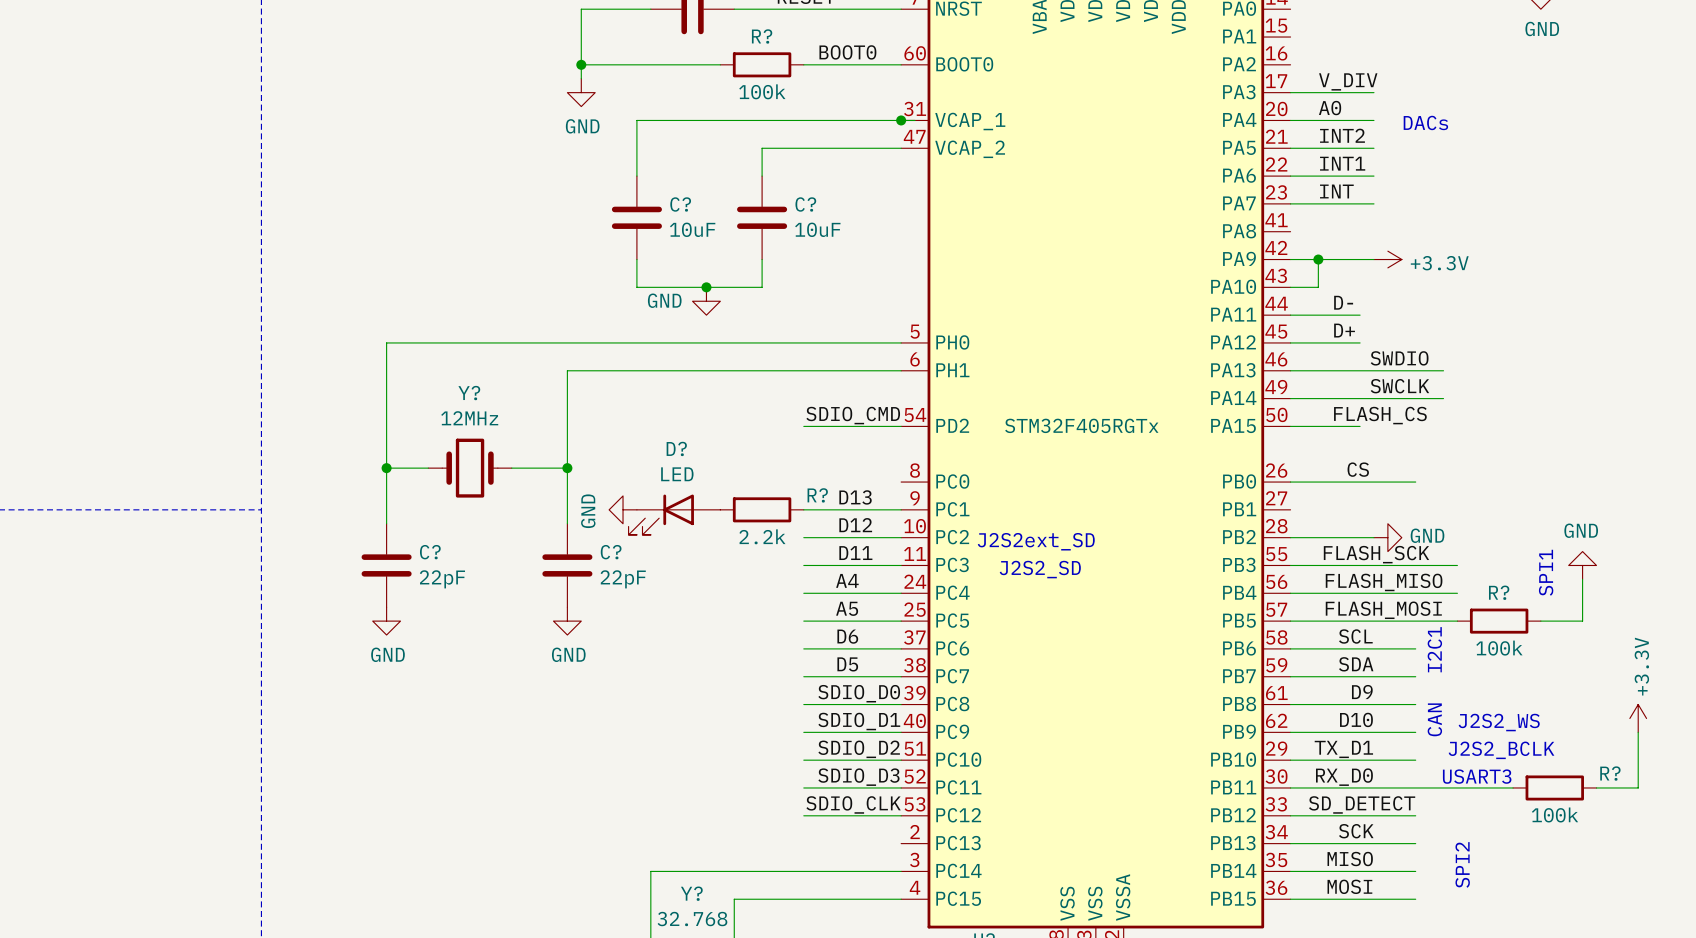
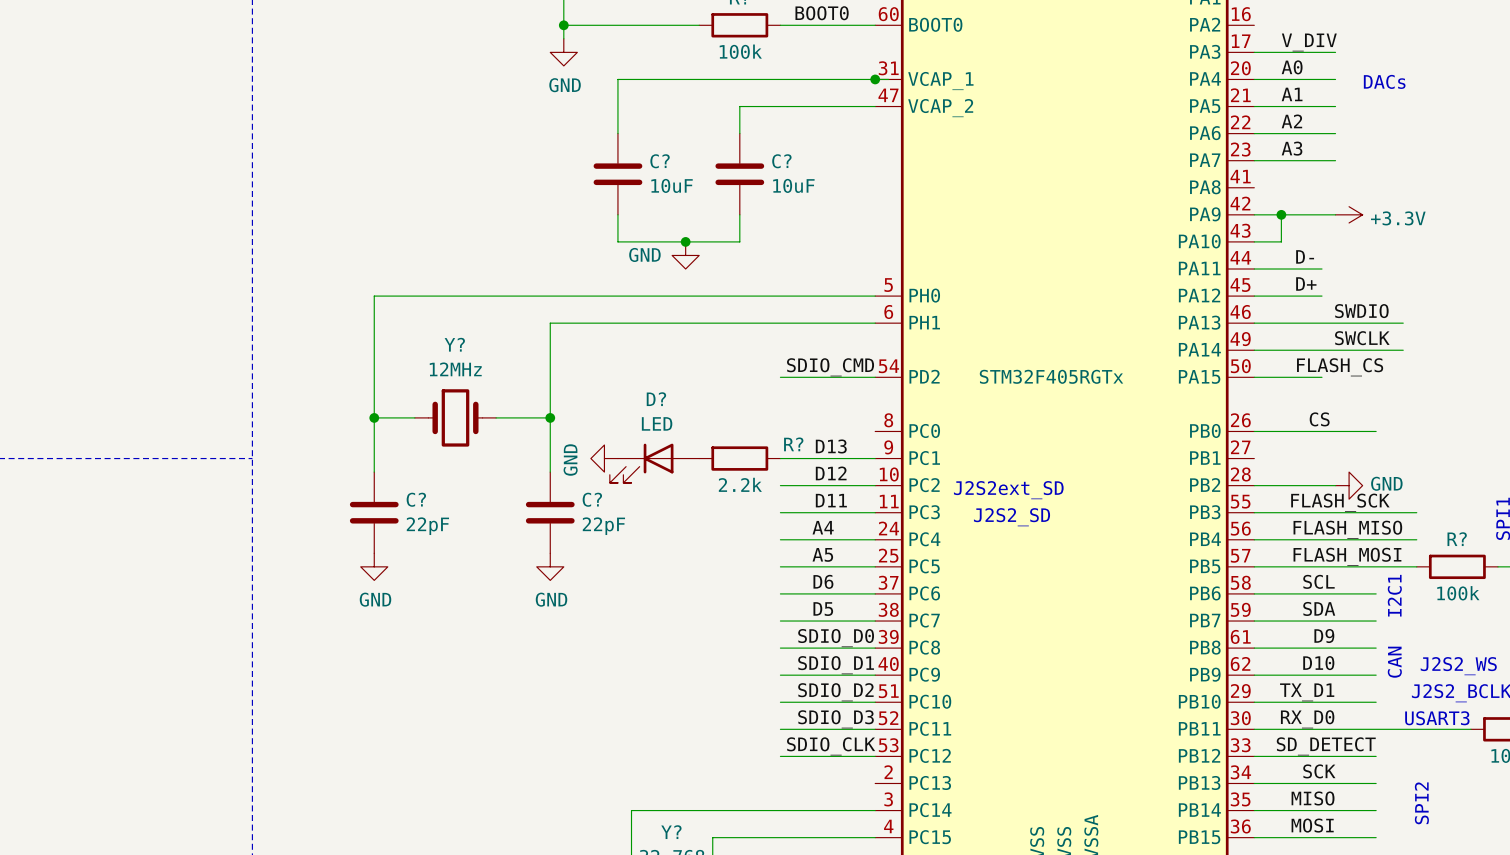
label: INT2 (1342, 135) -> A1 (1292, 94)
label: INT1 (1342, 163) -> A2 (1291, 121)
label: INT (1336, 191) -> A3 (1292, 148)

